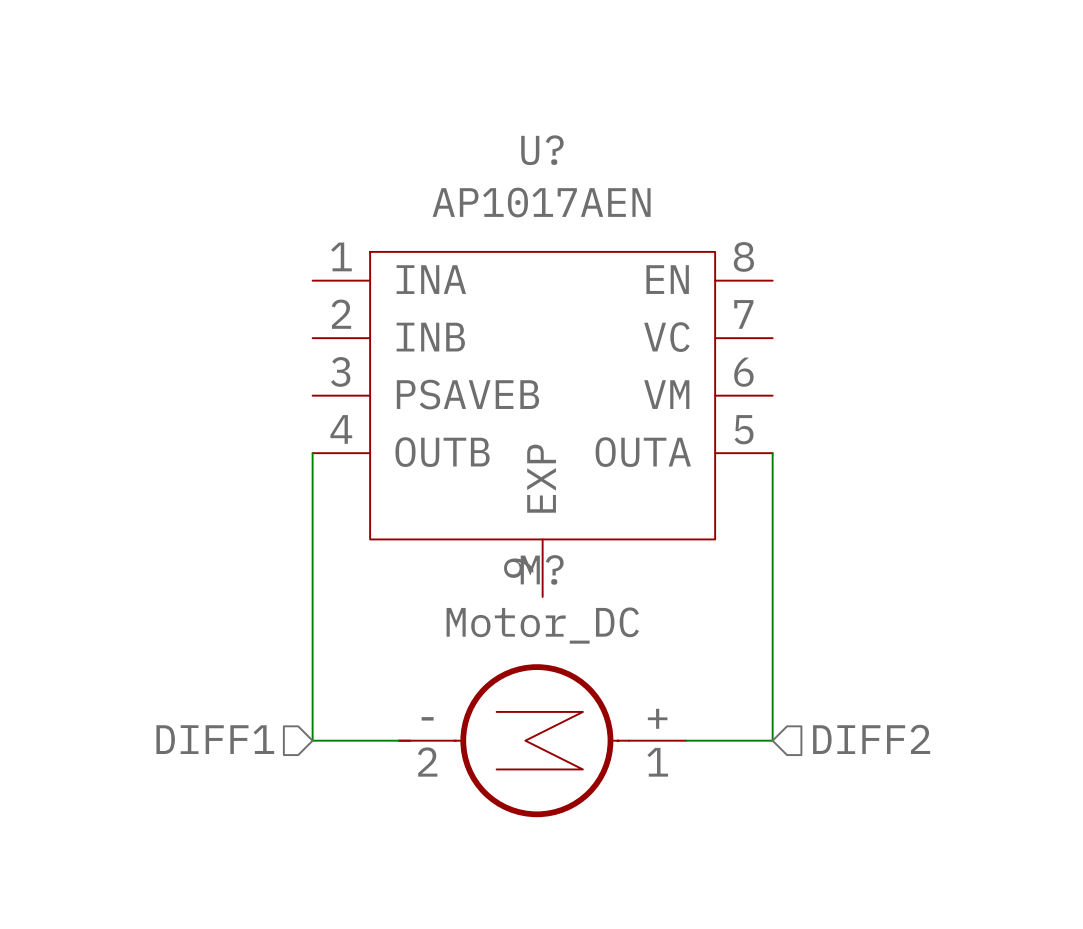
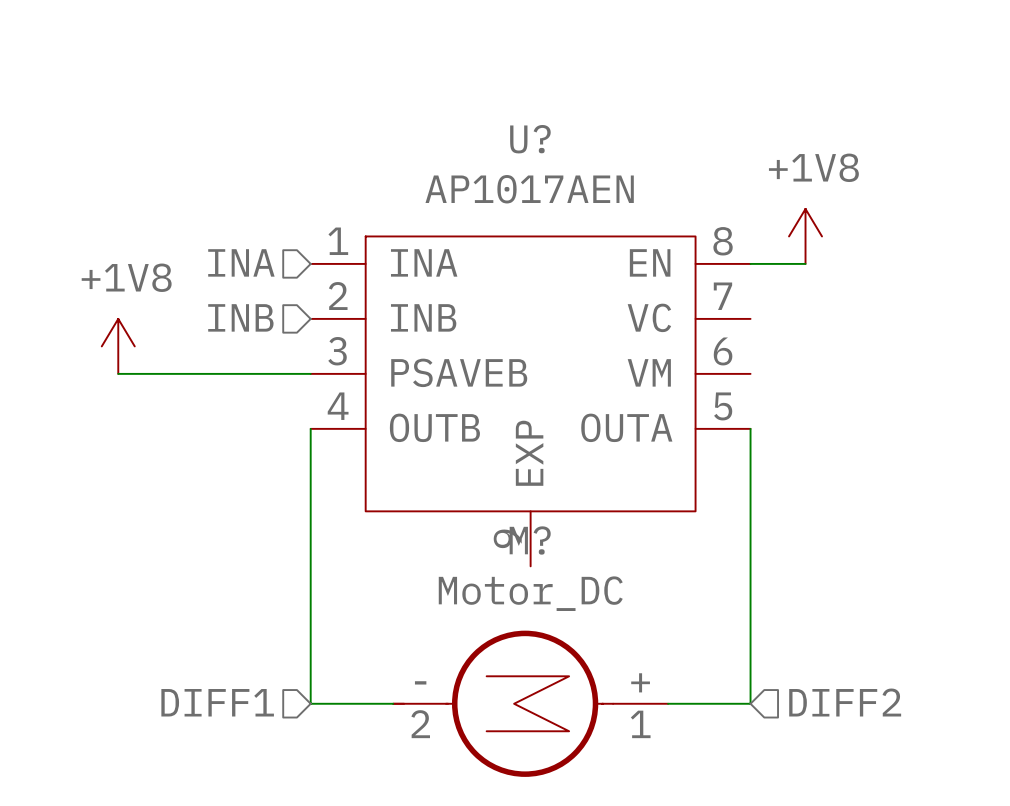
power symbol: none -> +1V8 (805, 236)
hierarchical label: none -> INA (241, 262)
wire: none -> (750, 263) (805, 263)
hierarchical label: none -> INB (240, 317)
power symbol: none -> +1V8 (118, 346)
wire: none -> (118, 373) (310, 373)

